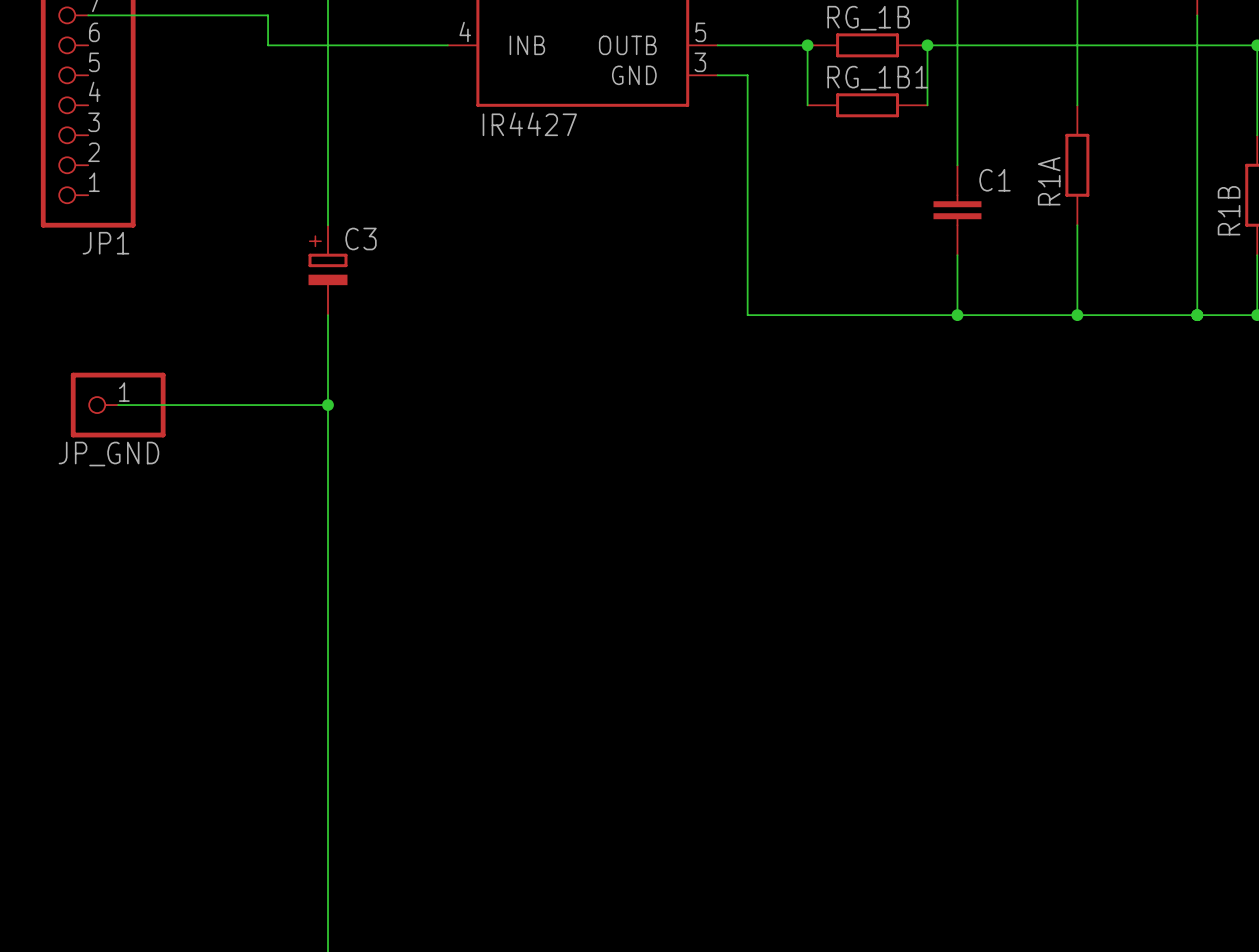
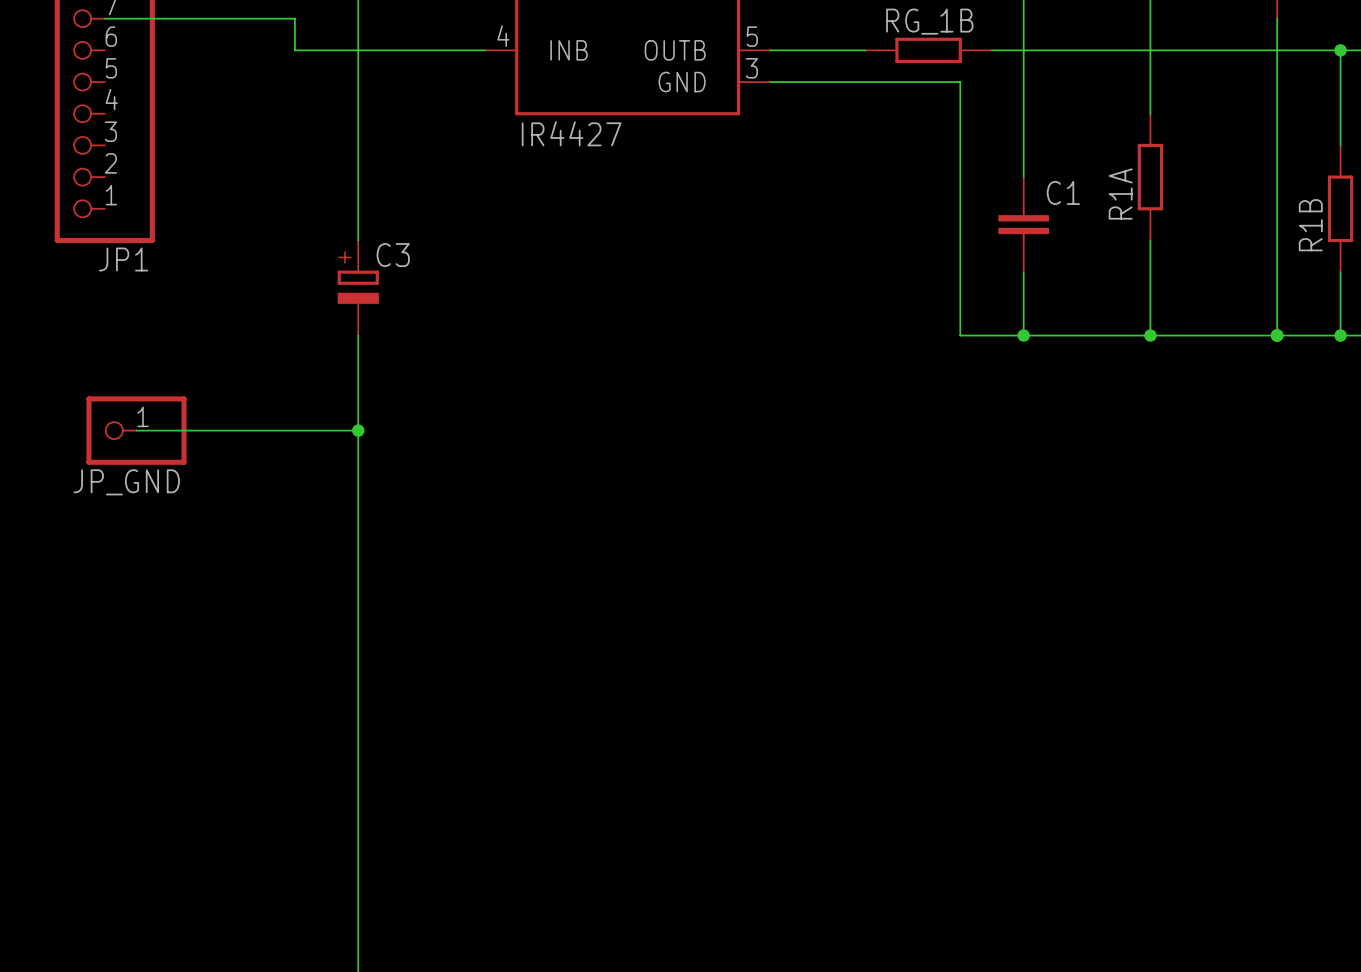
wire: (807, 45) (807, 105) -> none
junction: (807, 45) -> none
wire: (927, 45) (927, 105) -> none
junction: (927, 45) -> none
wire: (747, 75) (747, 315) (897, 315) -> (801, 82) (960, 82) (960, 335)
RG_1B1: (867, 105) -> none

